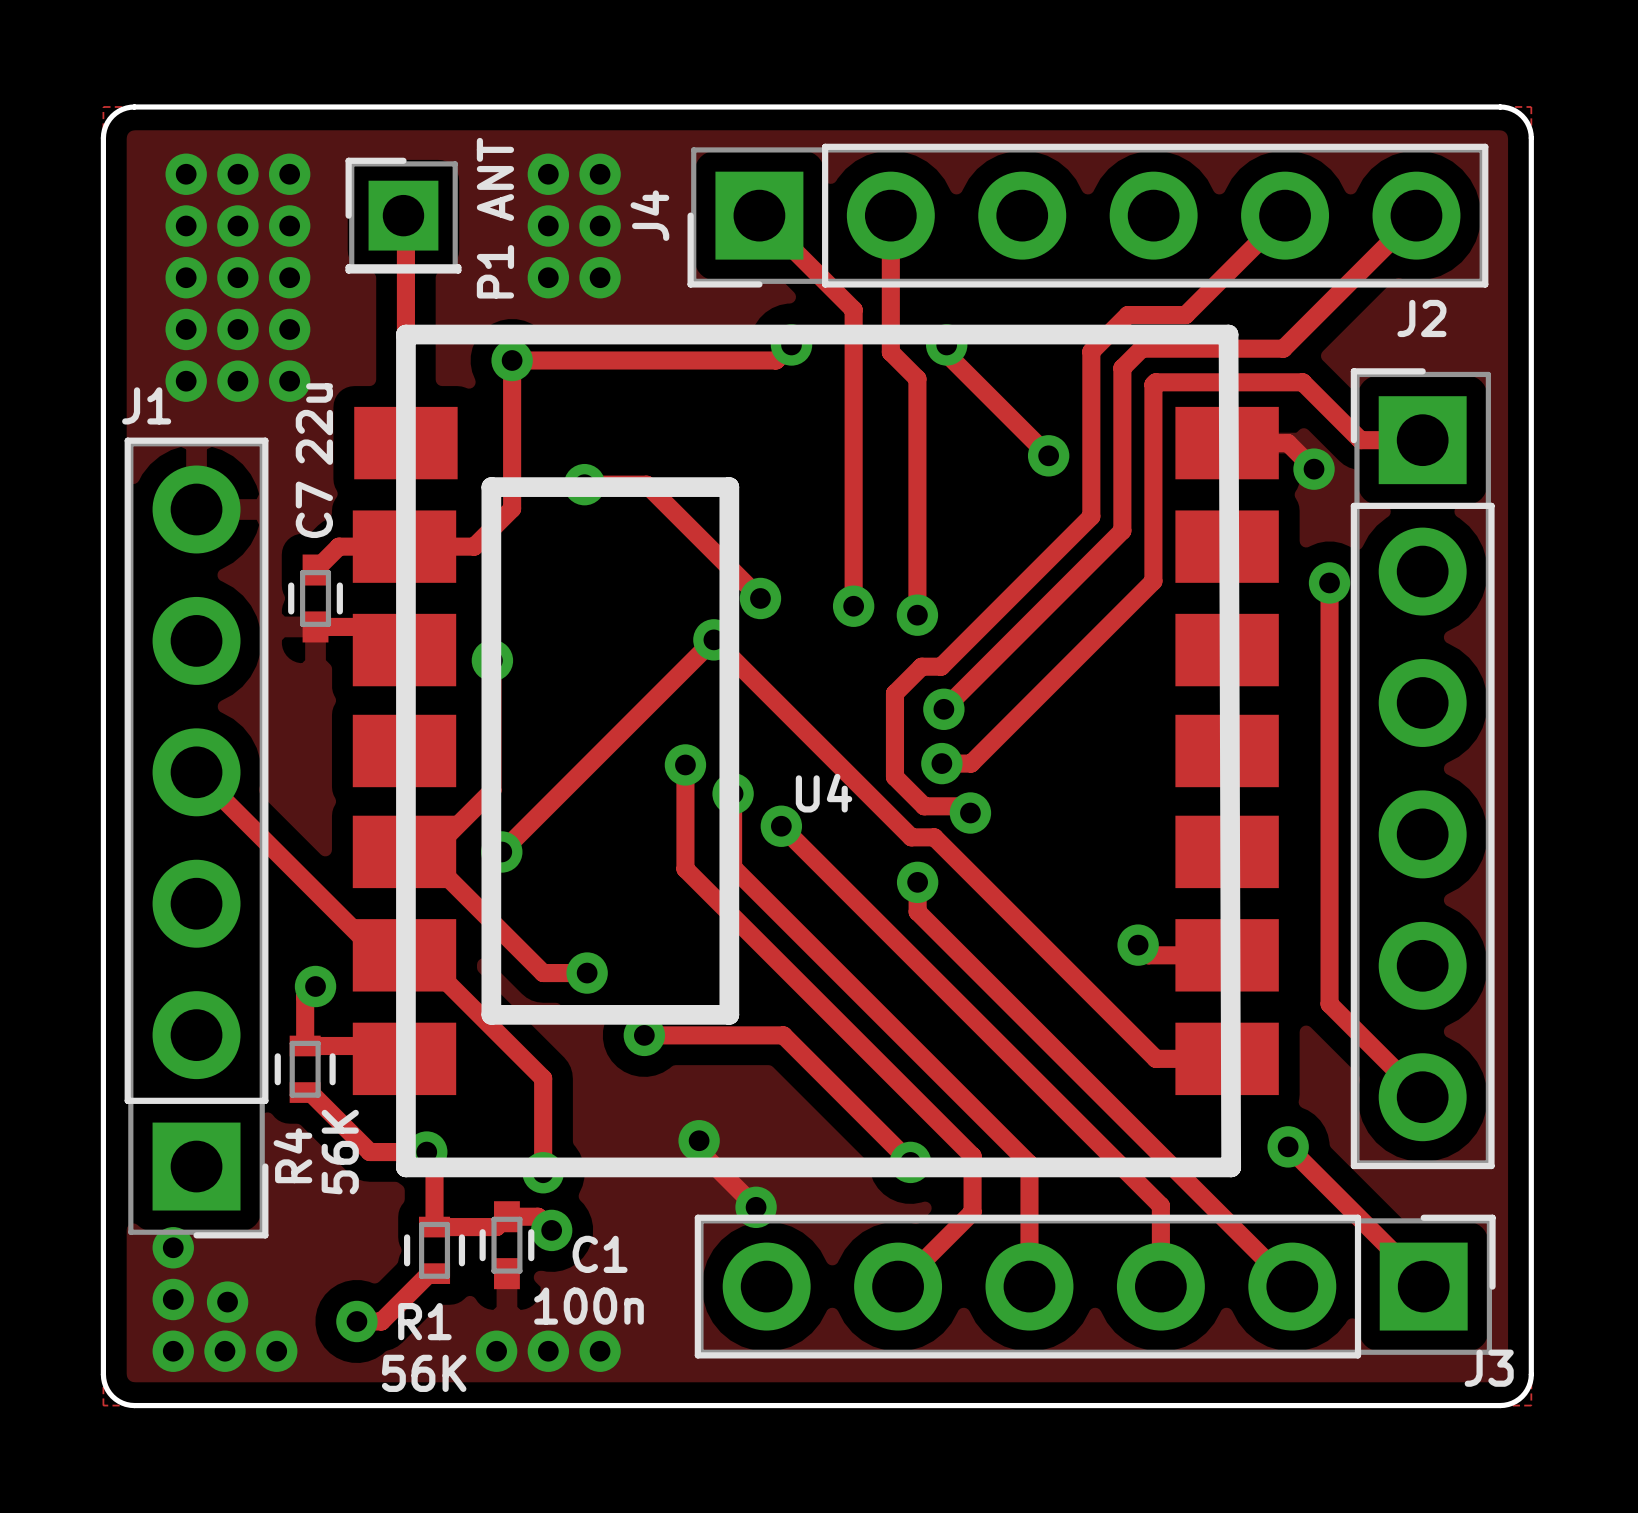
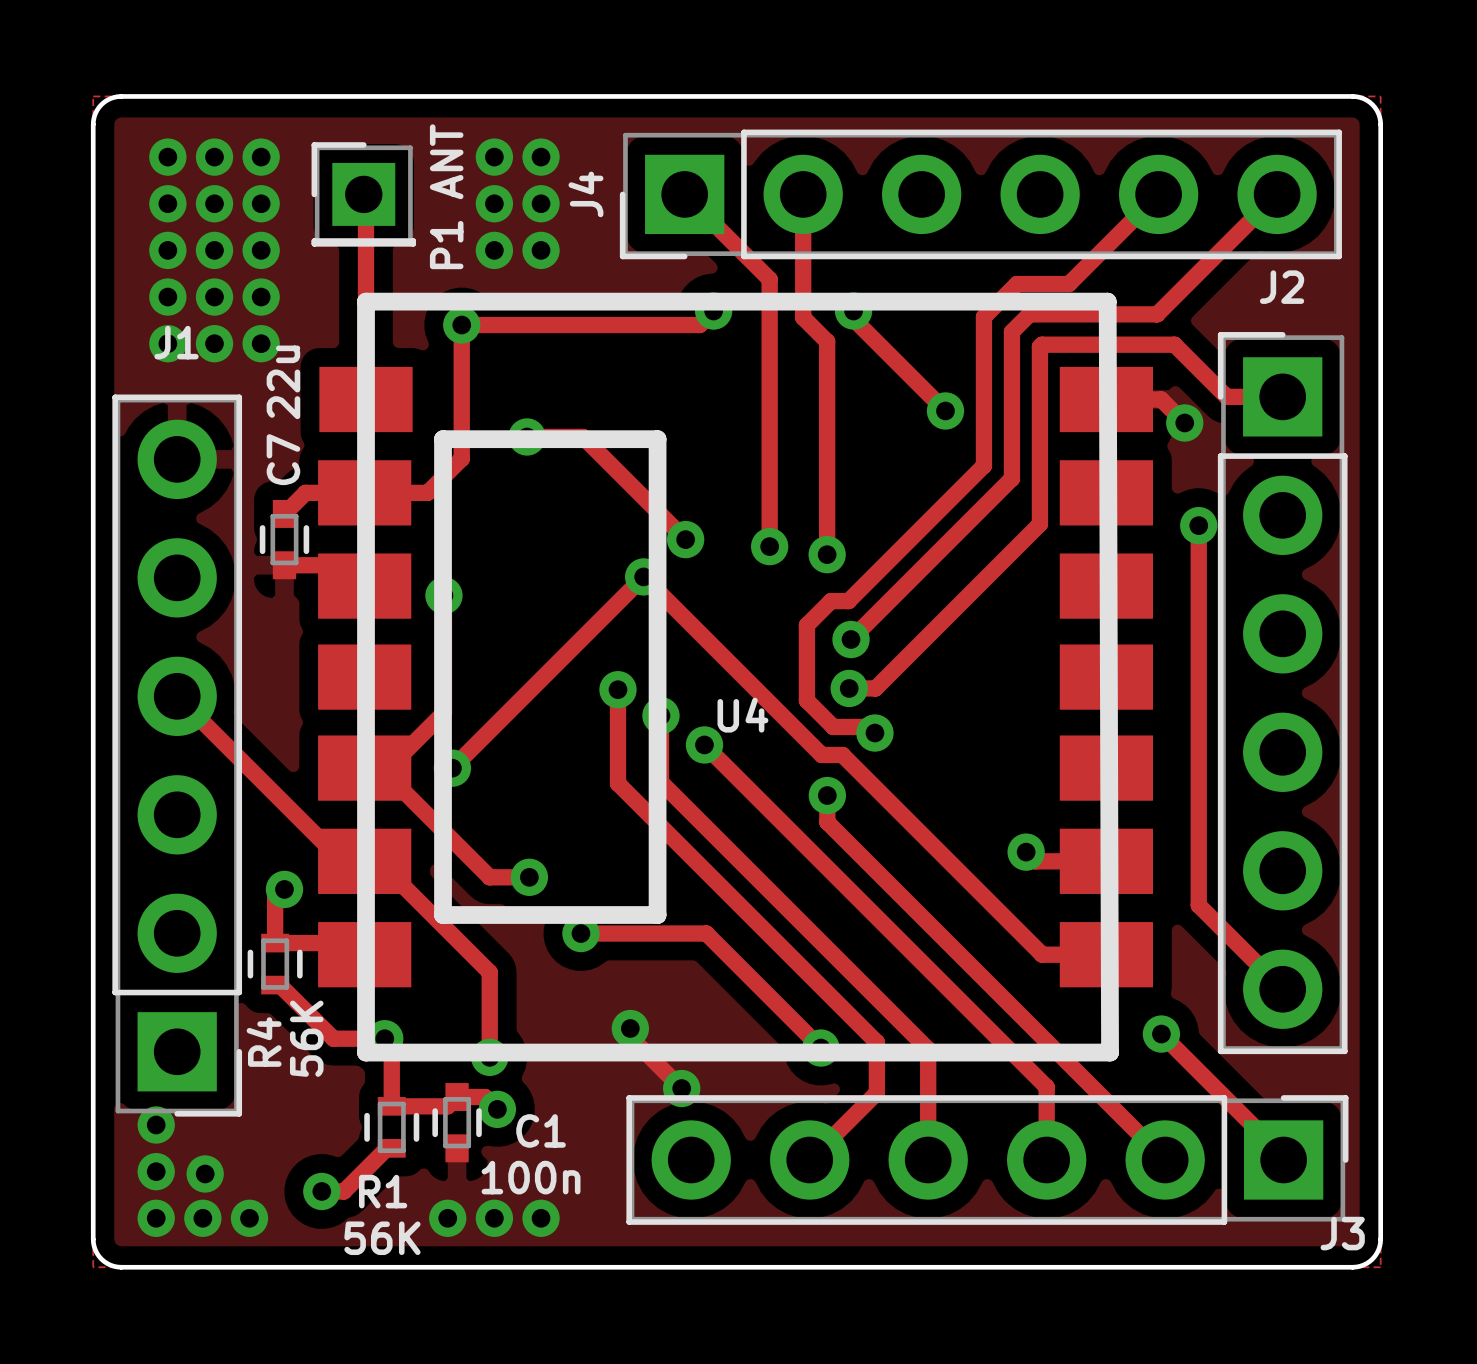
J1 name position: J1 (146, 405) -> J1 (176, 342)

